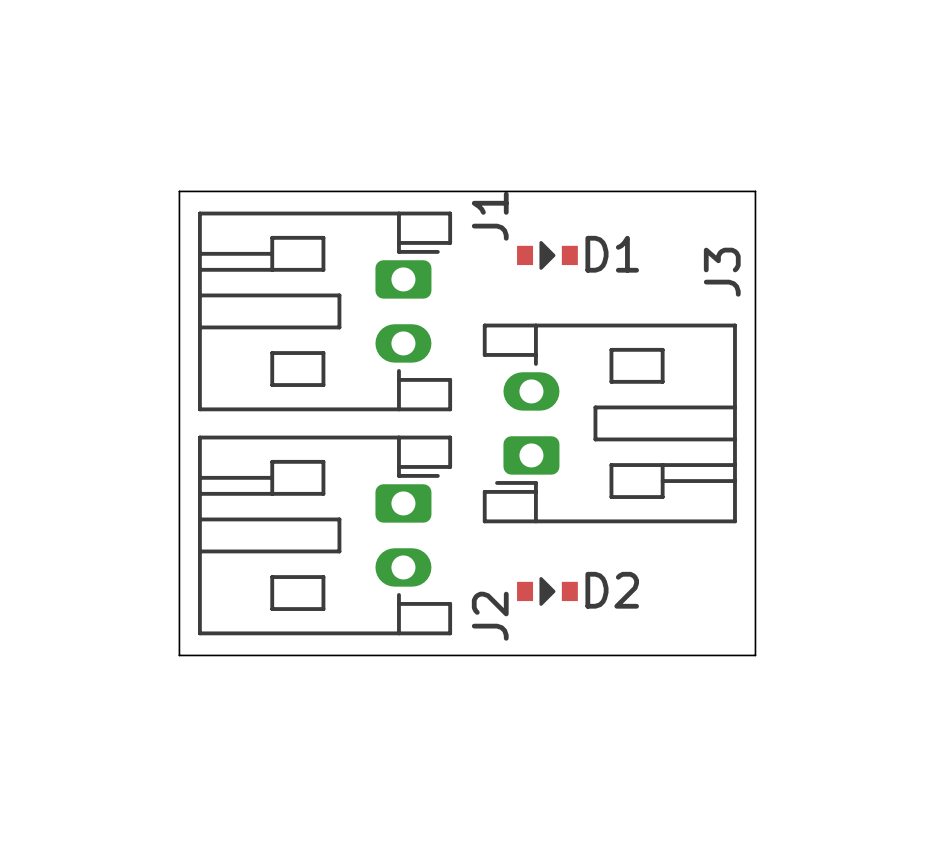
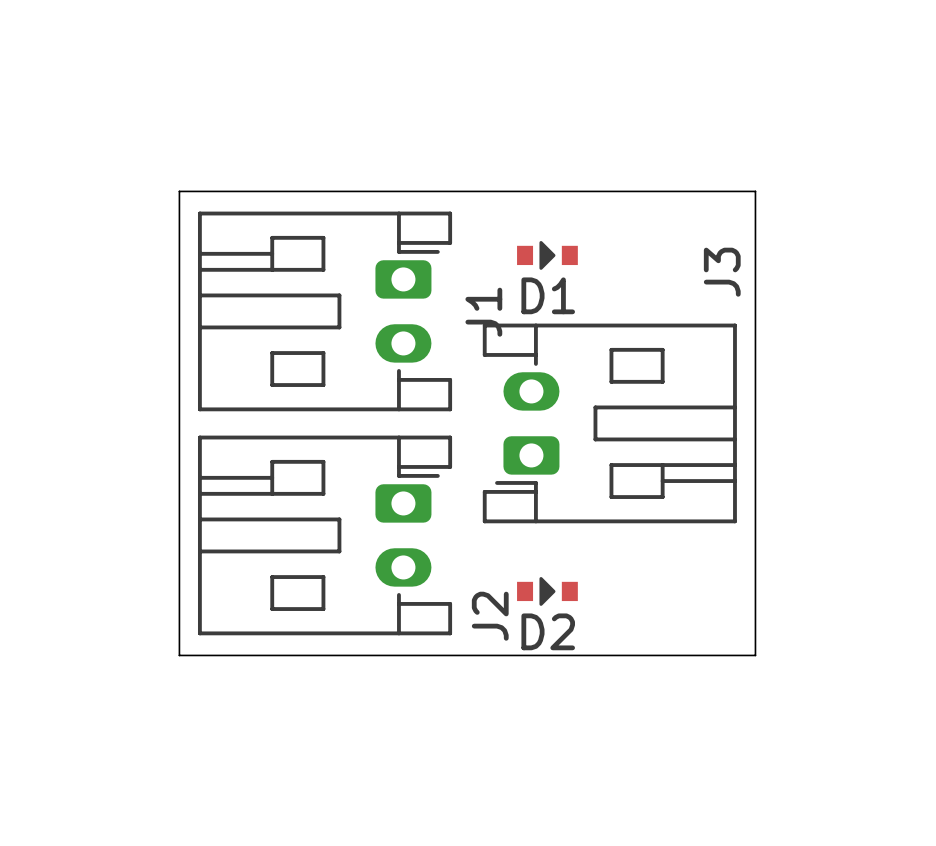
J1 name position: J1 (490, 216) -> J1 (483, 312)
D1 name position: D1 (612, 254) -> D1 (548, 295)
D2 name position: D2 (612, 590) -> D2 (548, 631)

